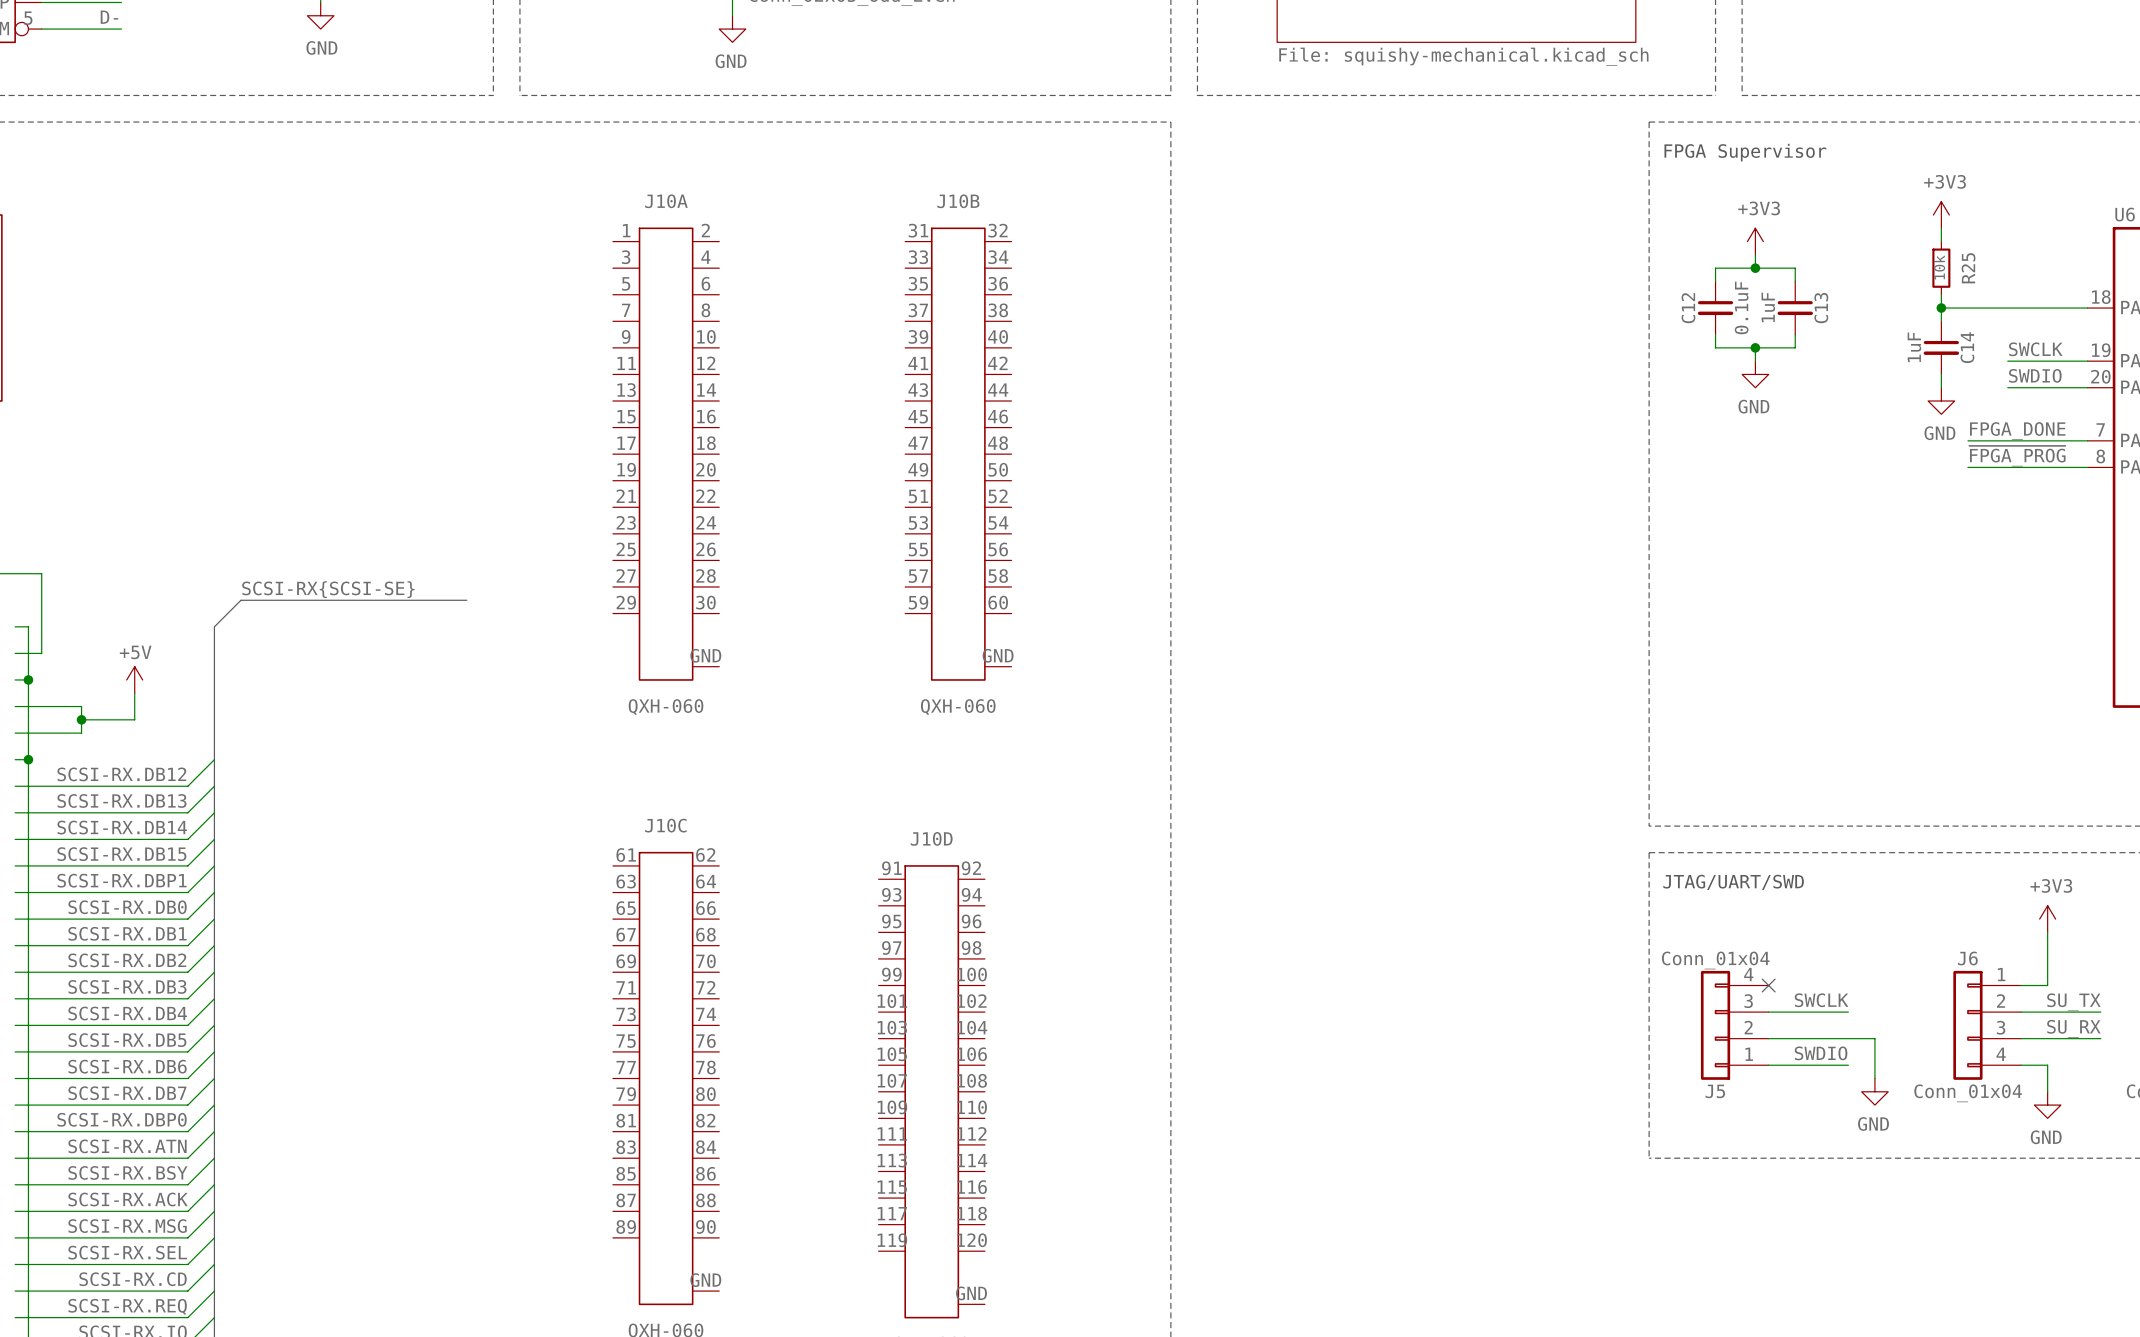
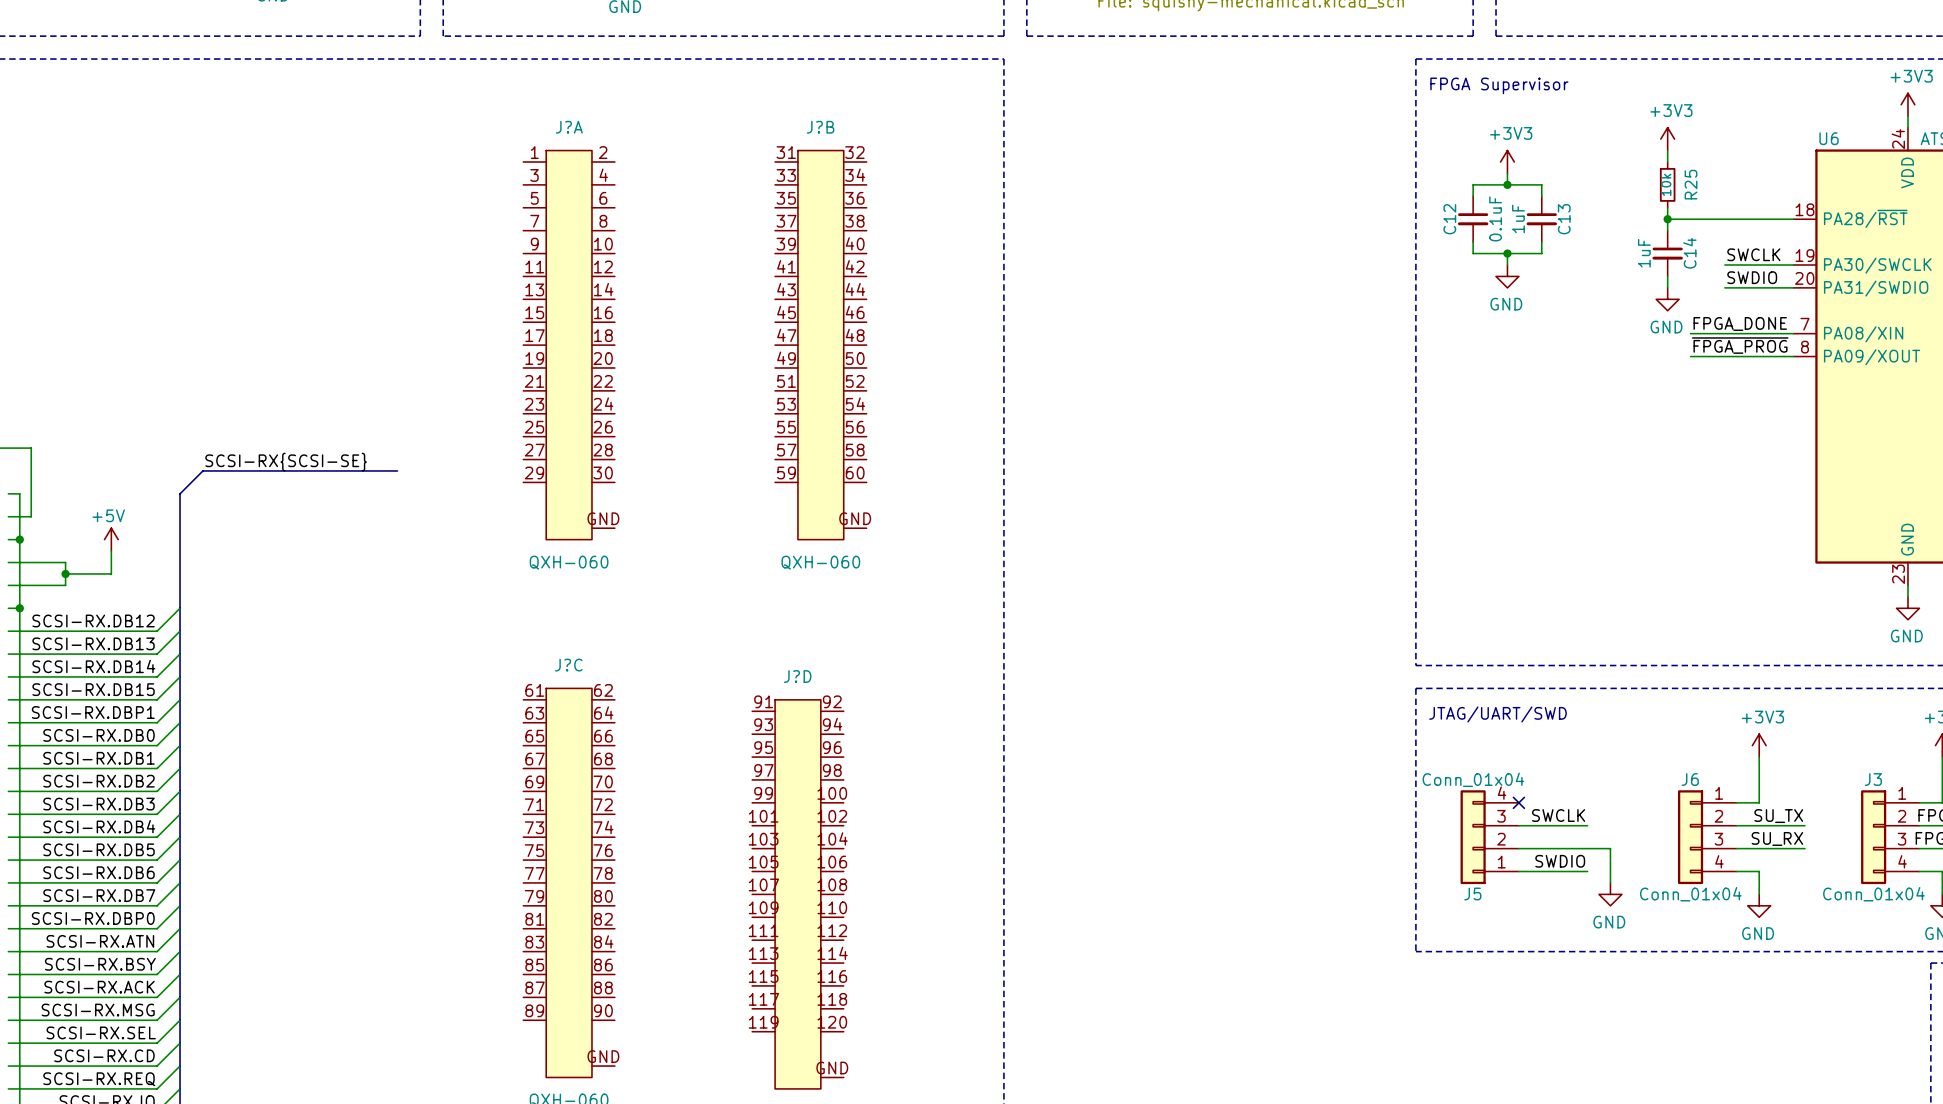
J10A name: J10A (666, 201) -> J?A (569, 127)
J10B name: J10B (958, 201) -> J?B (820, 127)
J10C name: J10C (665, 825) -> J?C (568, 665)
J10D name: J10D (931, 838) -> J?D (797, 676)

